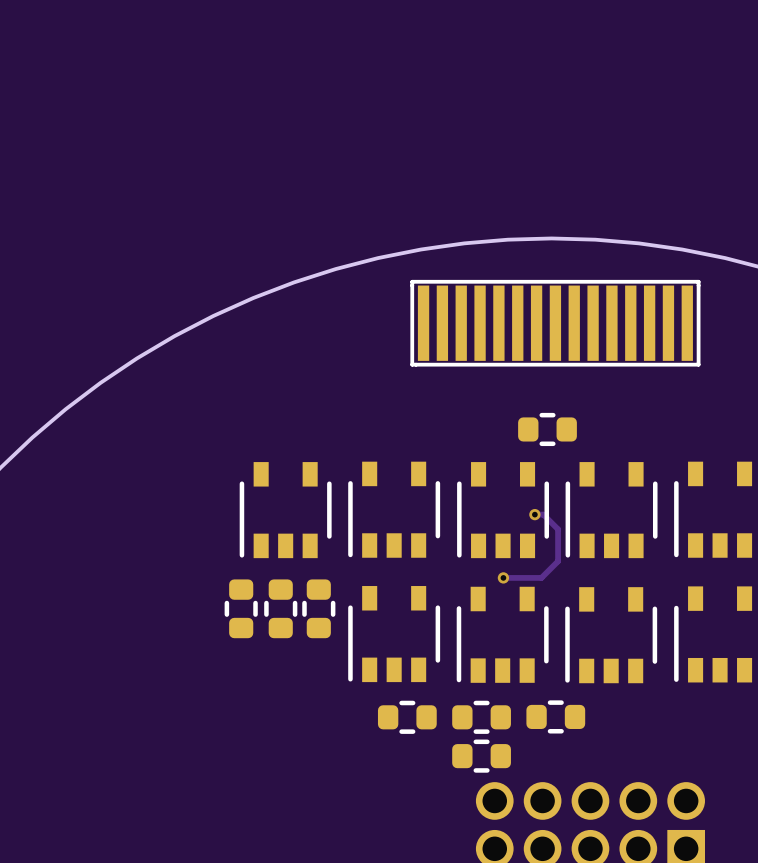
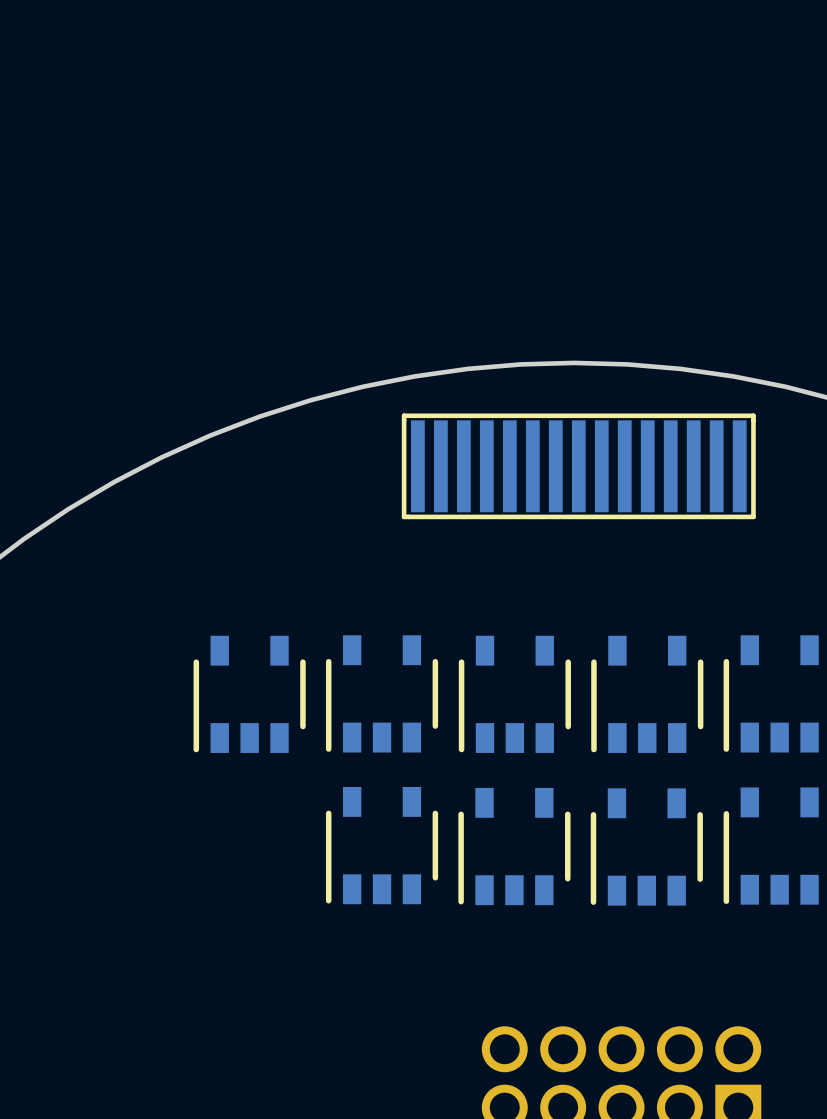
part: (547, 429) -> none
track: (534, 514) (543, 514) (558, 529) (558, 561) (541, 577) (503, 577) -> none
via: (534, 514) -> none
via: (503, 577) -> none
part: (241, 608) -> none
part: (280, 608) -> none
part: (318, 608) -> none
part: (555, 716) -> none
part: (407, 717) -> none
part: (481, 717) -> none
part: (481, 756) -> none

